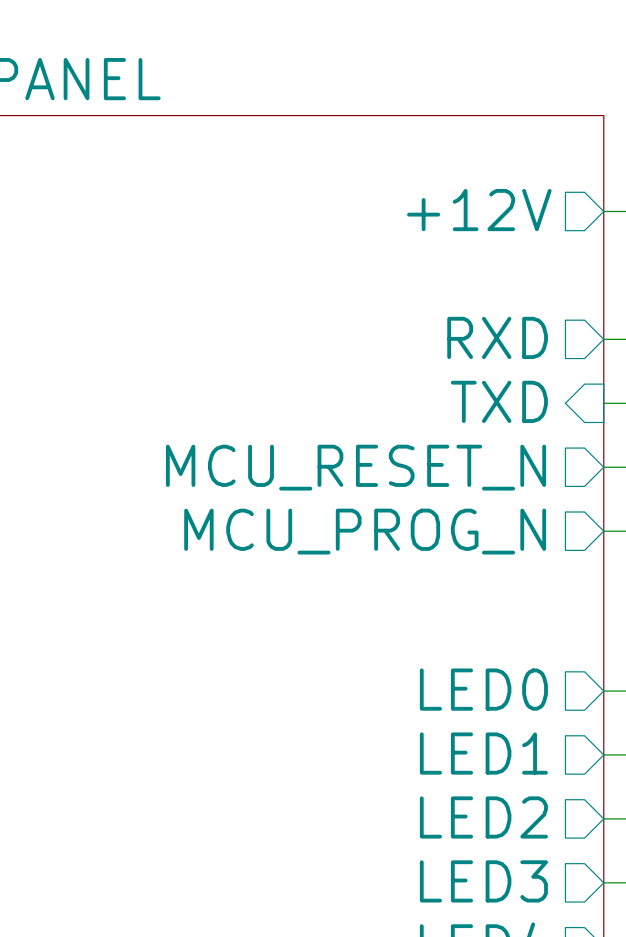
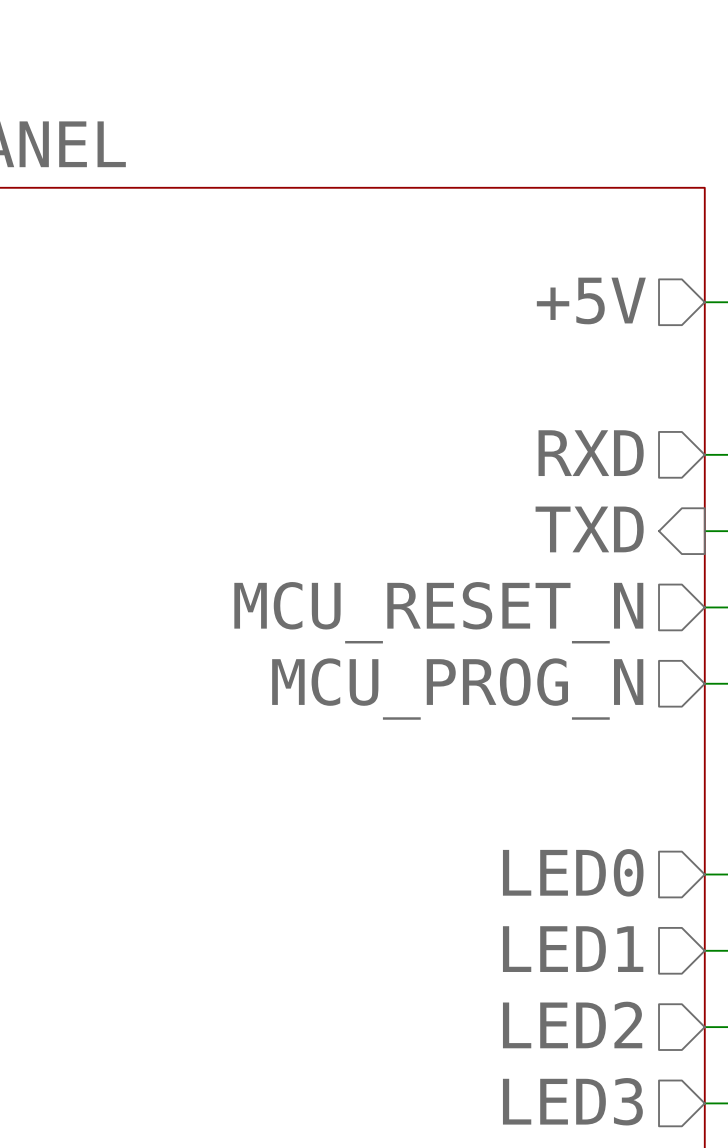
sheet pin: +12V (479, 210) -> +5V (591, 300)

